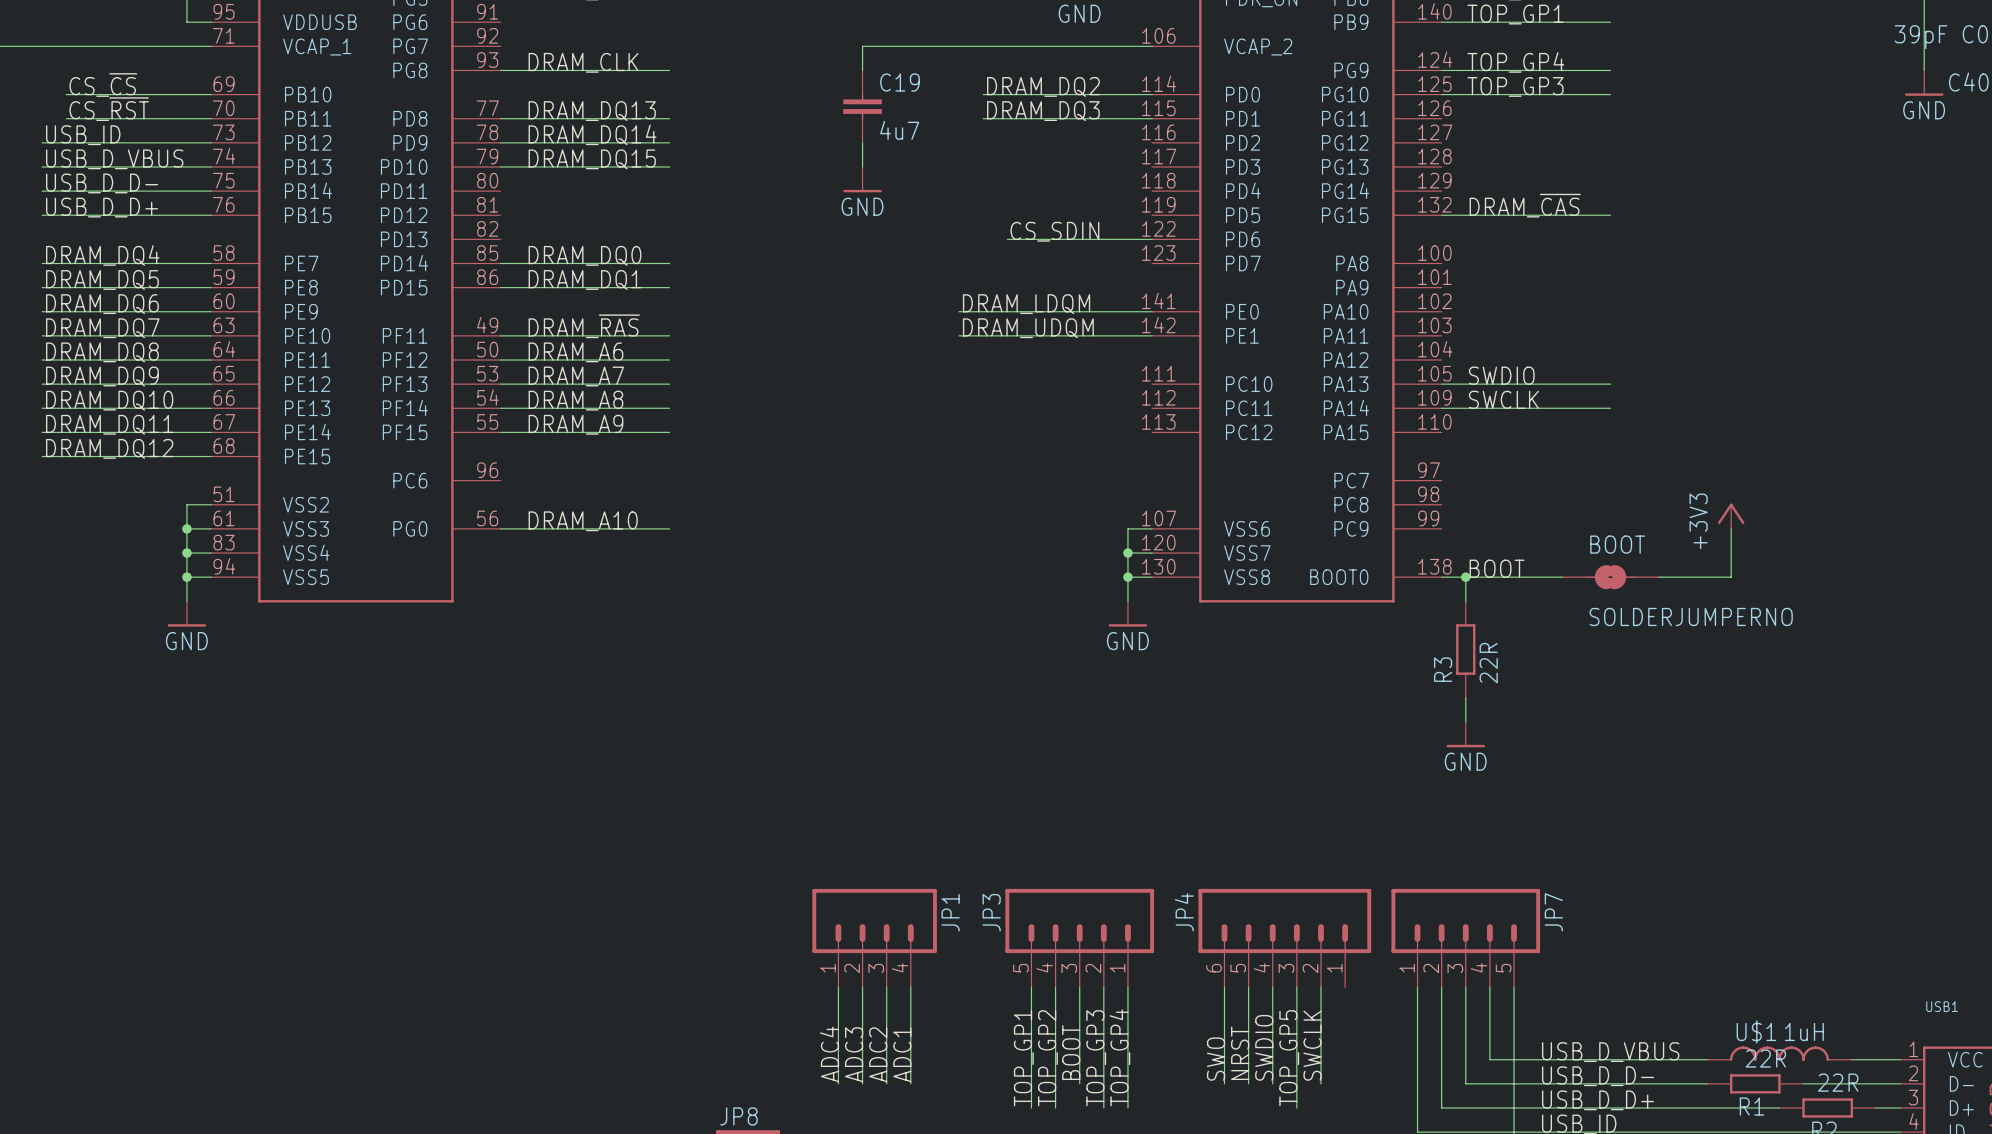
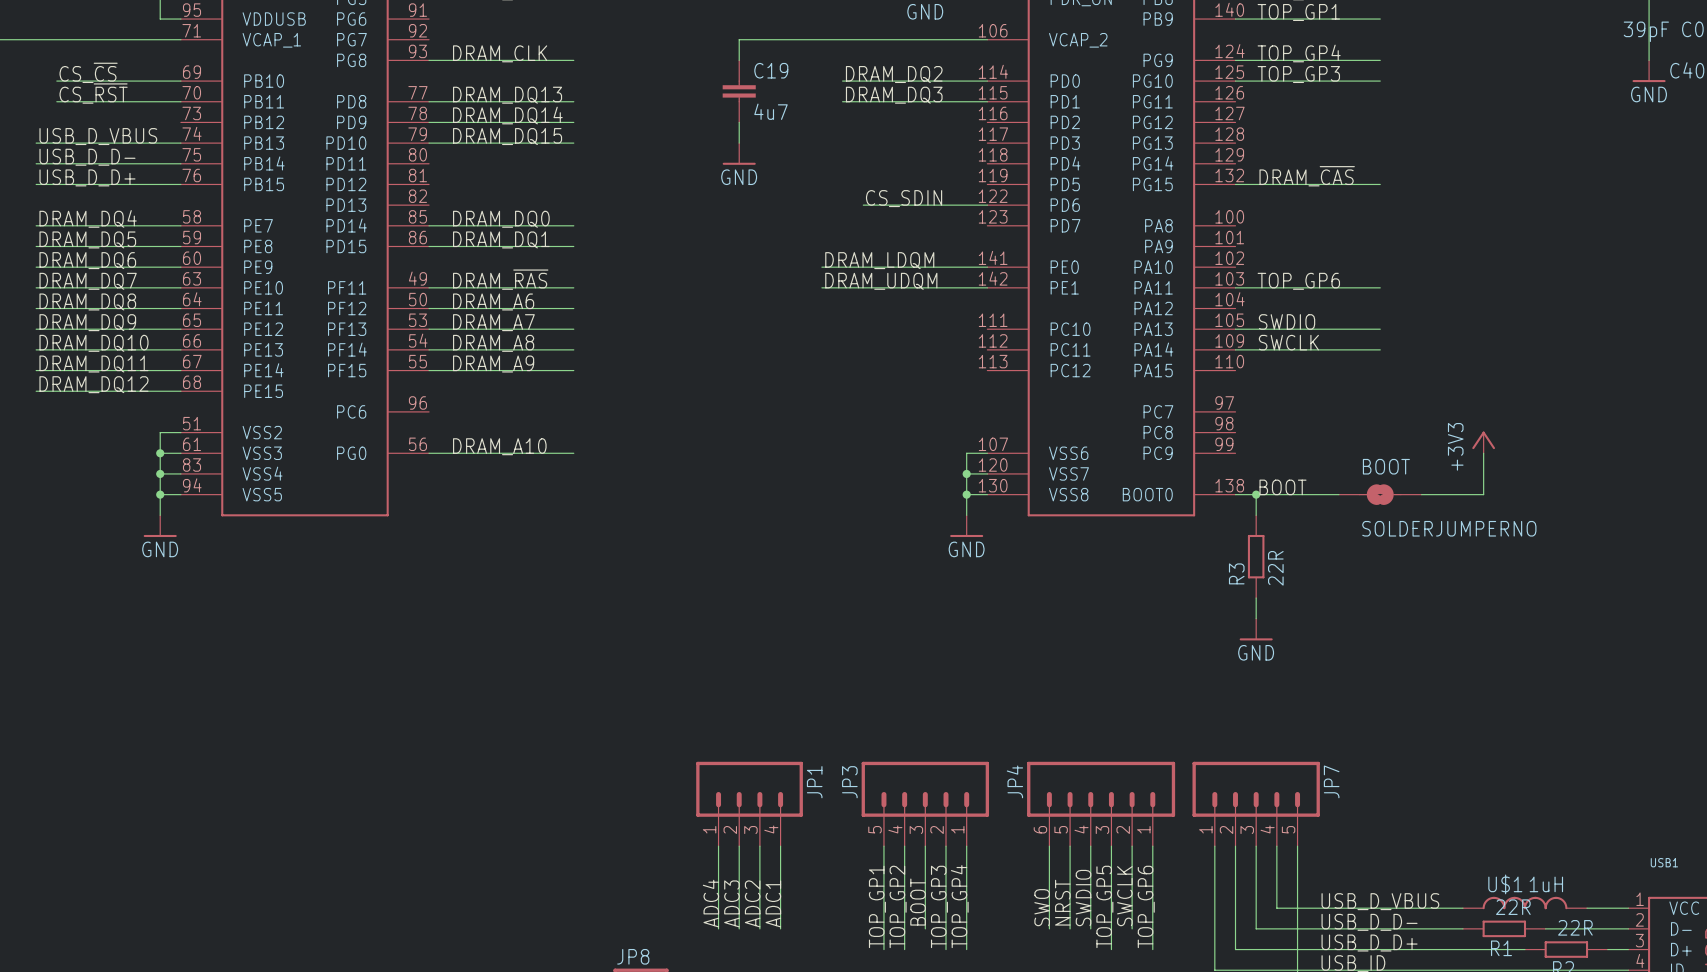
label: USB_ID (83, 135) -> none
wire: (42, 142) (211, 142) -> none
label: none -> TOP_GP6 (1298, 281)
wire: none -> (1235, 287) (1380, 287)
wire: none -> (1152, 846) (1152, 949)
label: none -> TOP_GP6 (1146, 906)

